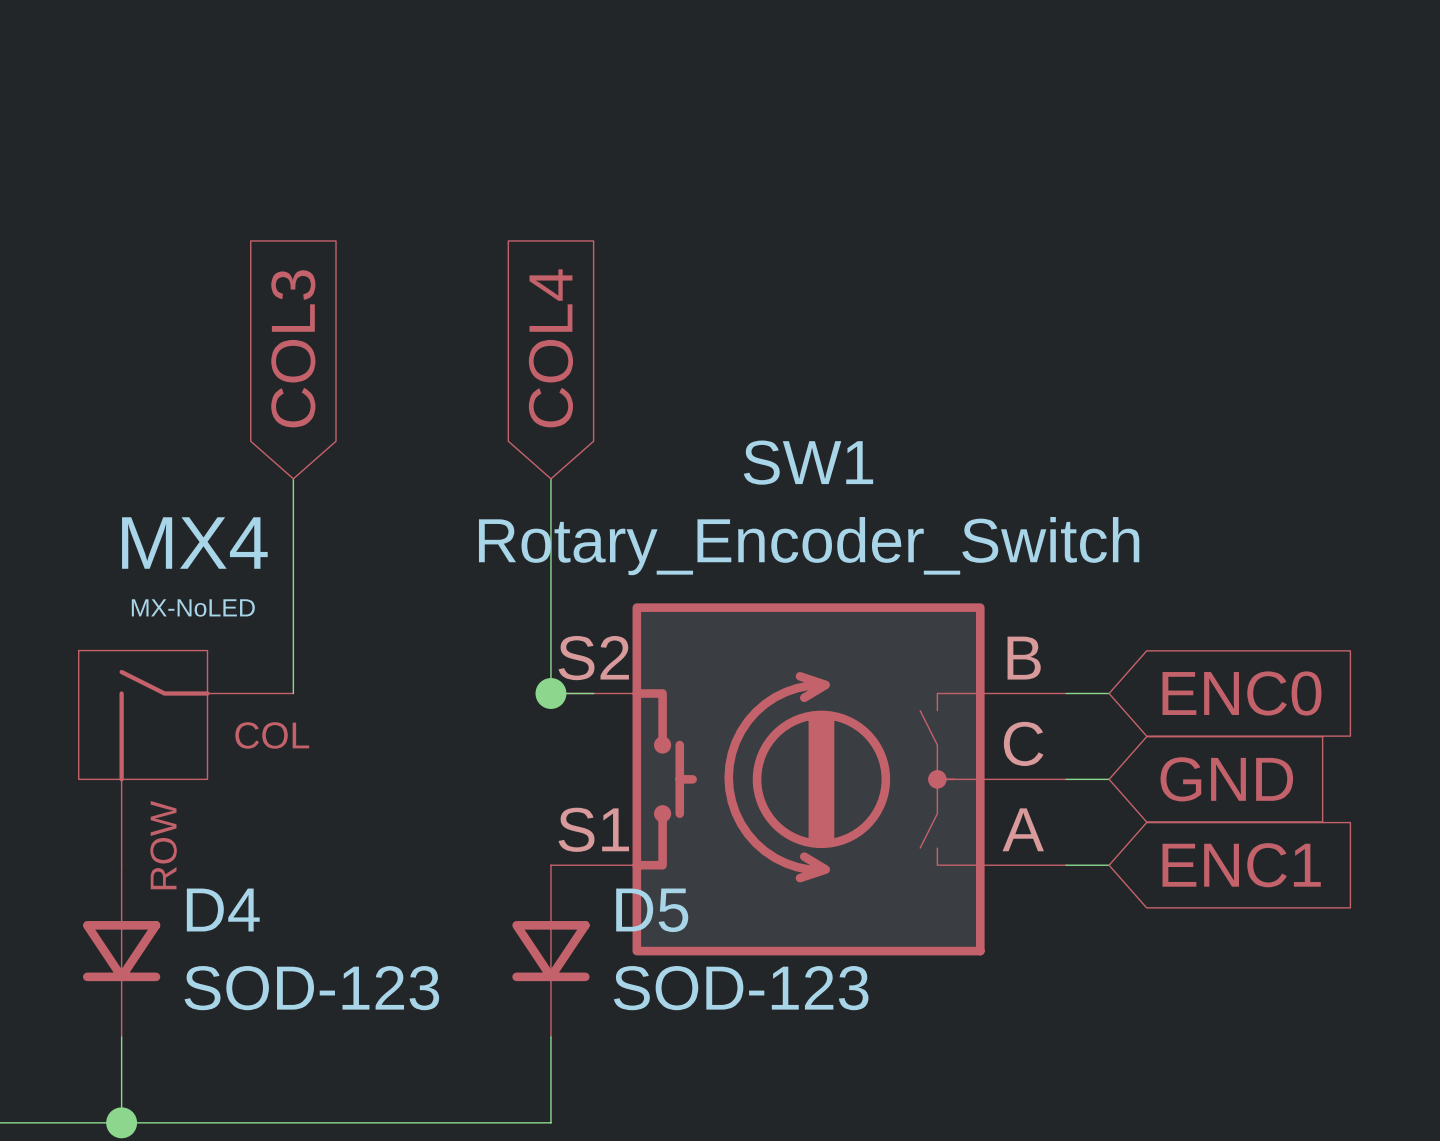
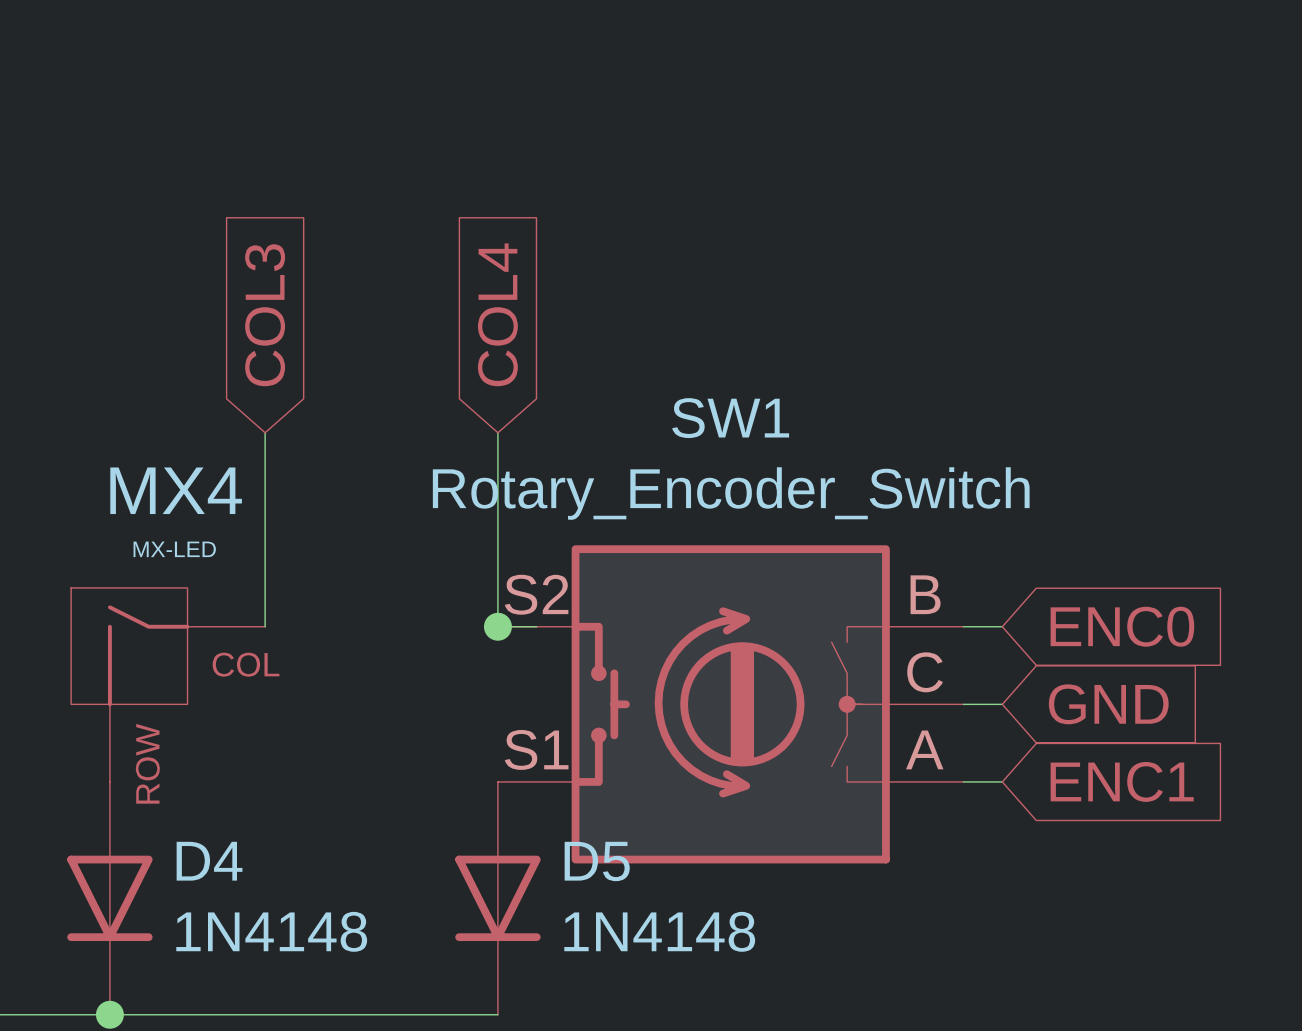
MX4 value: MX-NoLED (193, 607) -> MX-LED (174, 549)
D4 symbol: [82, 865, 161, 1037] -> [67, 781, 153, 1015]
D5 symbol: [512, 865, 590, 1037] -> [455, 781, 541, 1015]
D4 value: SOD-123 (311, 988) -> 1N4148 (271, 931)
D5 value: SOD-123 (741, 988) -> 1N4148 (659, 931)

